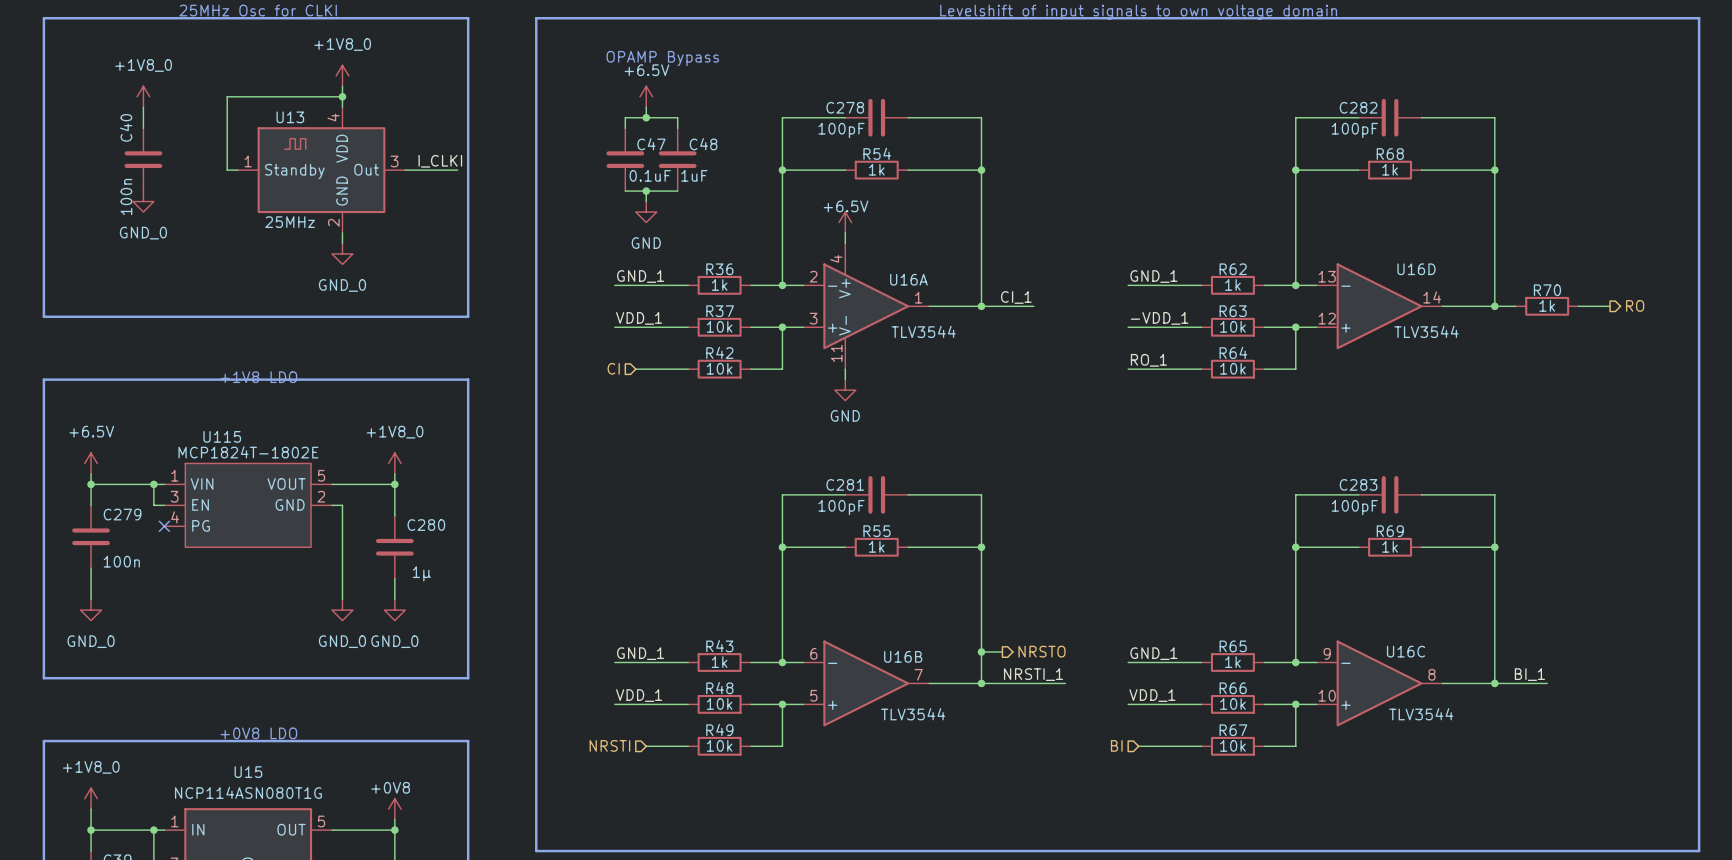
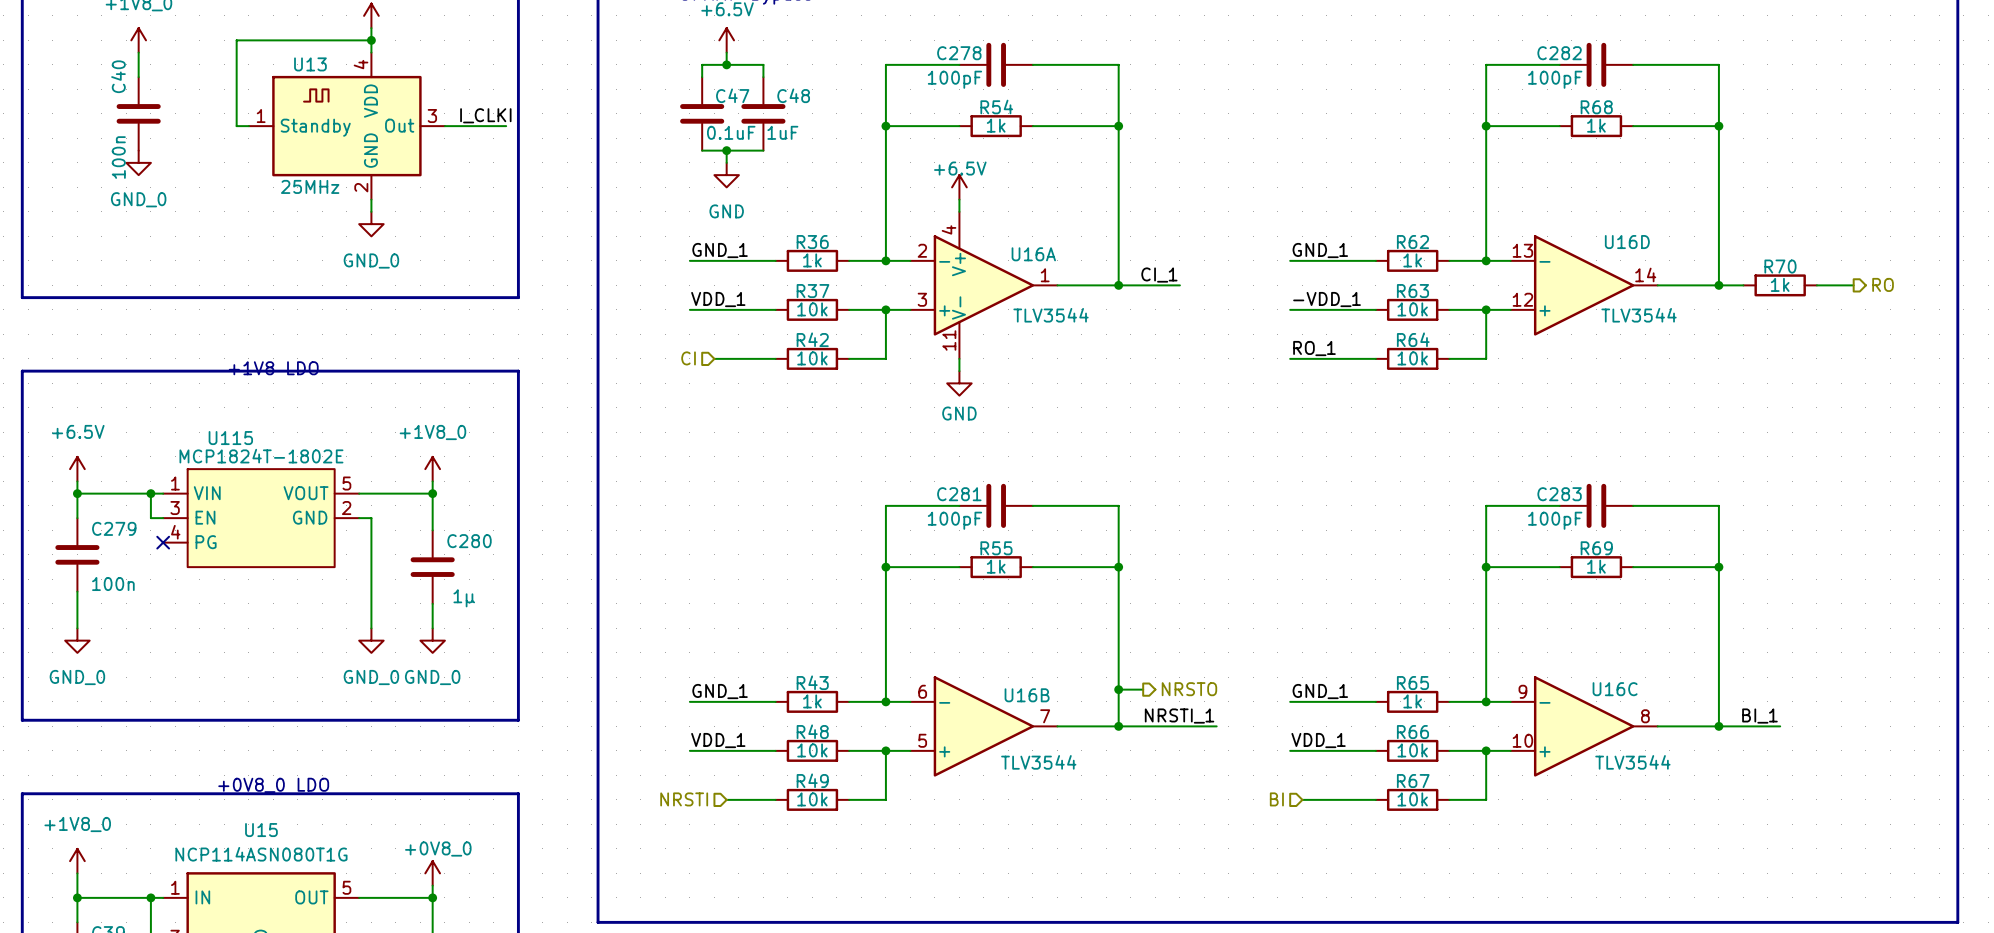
text: +0V8 LDO (258, 733) -> +0V8_0 LDO (273, 785)
part value: +0V8 (390, 787) -> +0V8_0 (438, 849)

